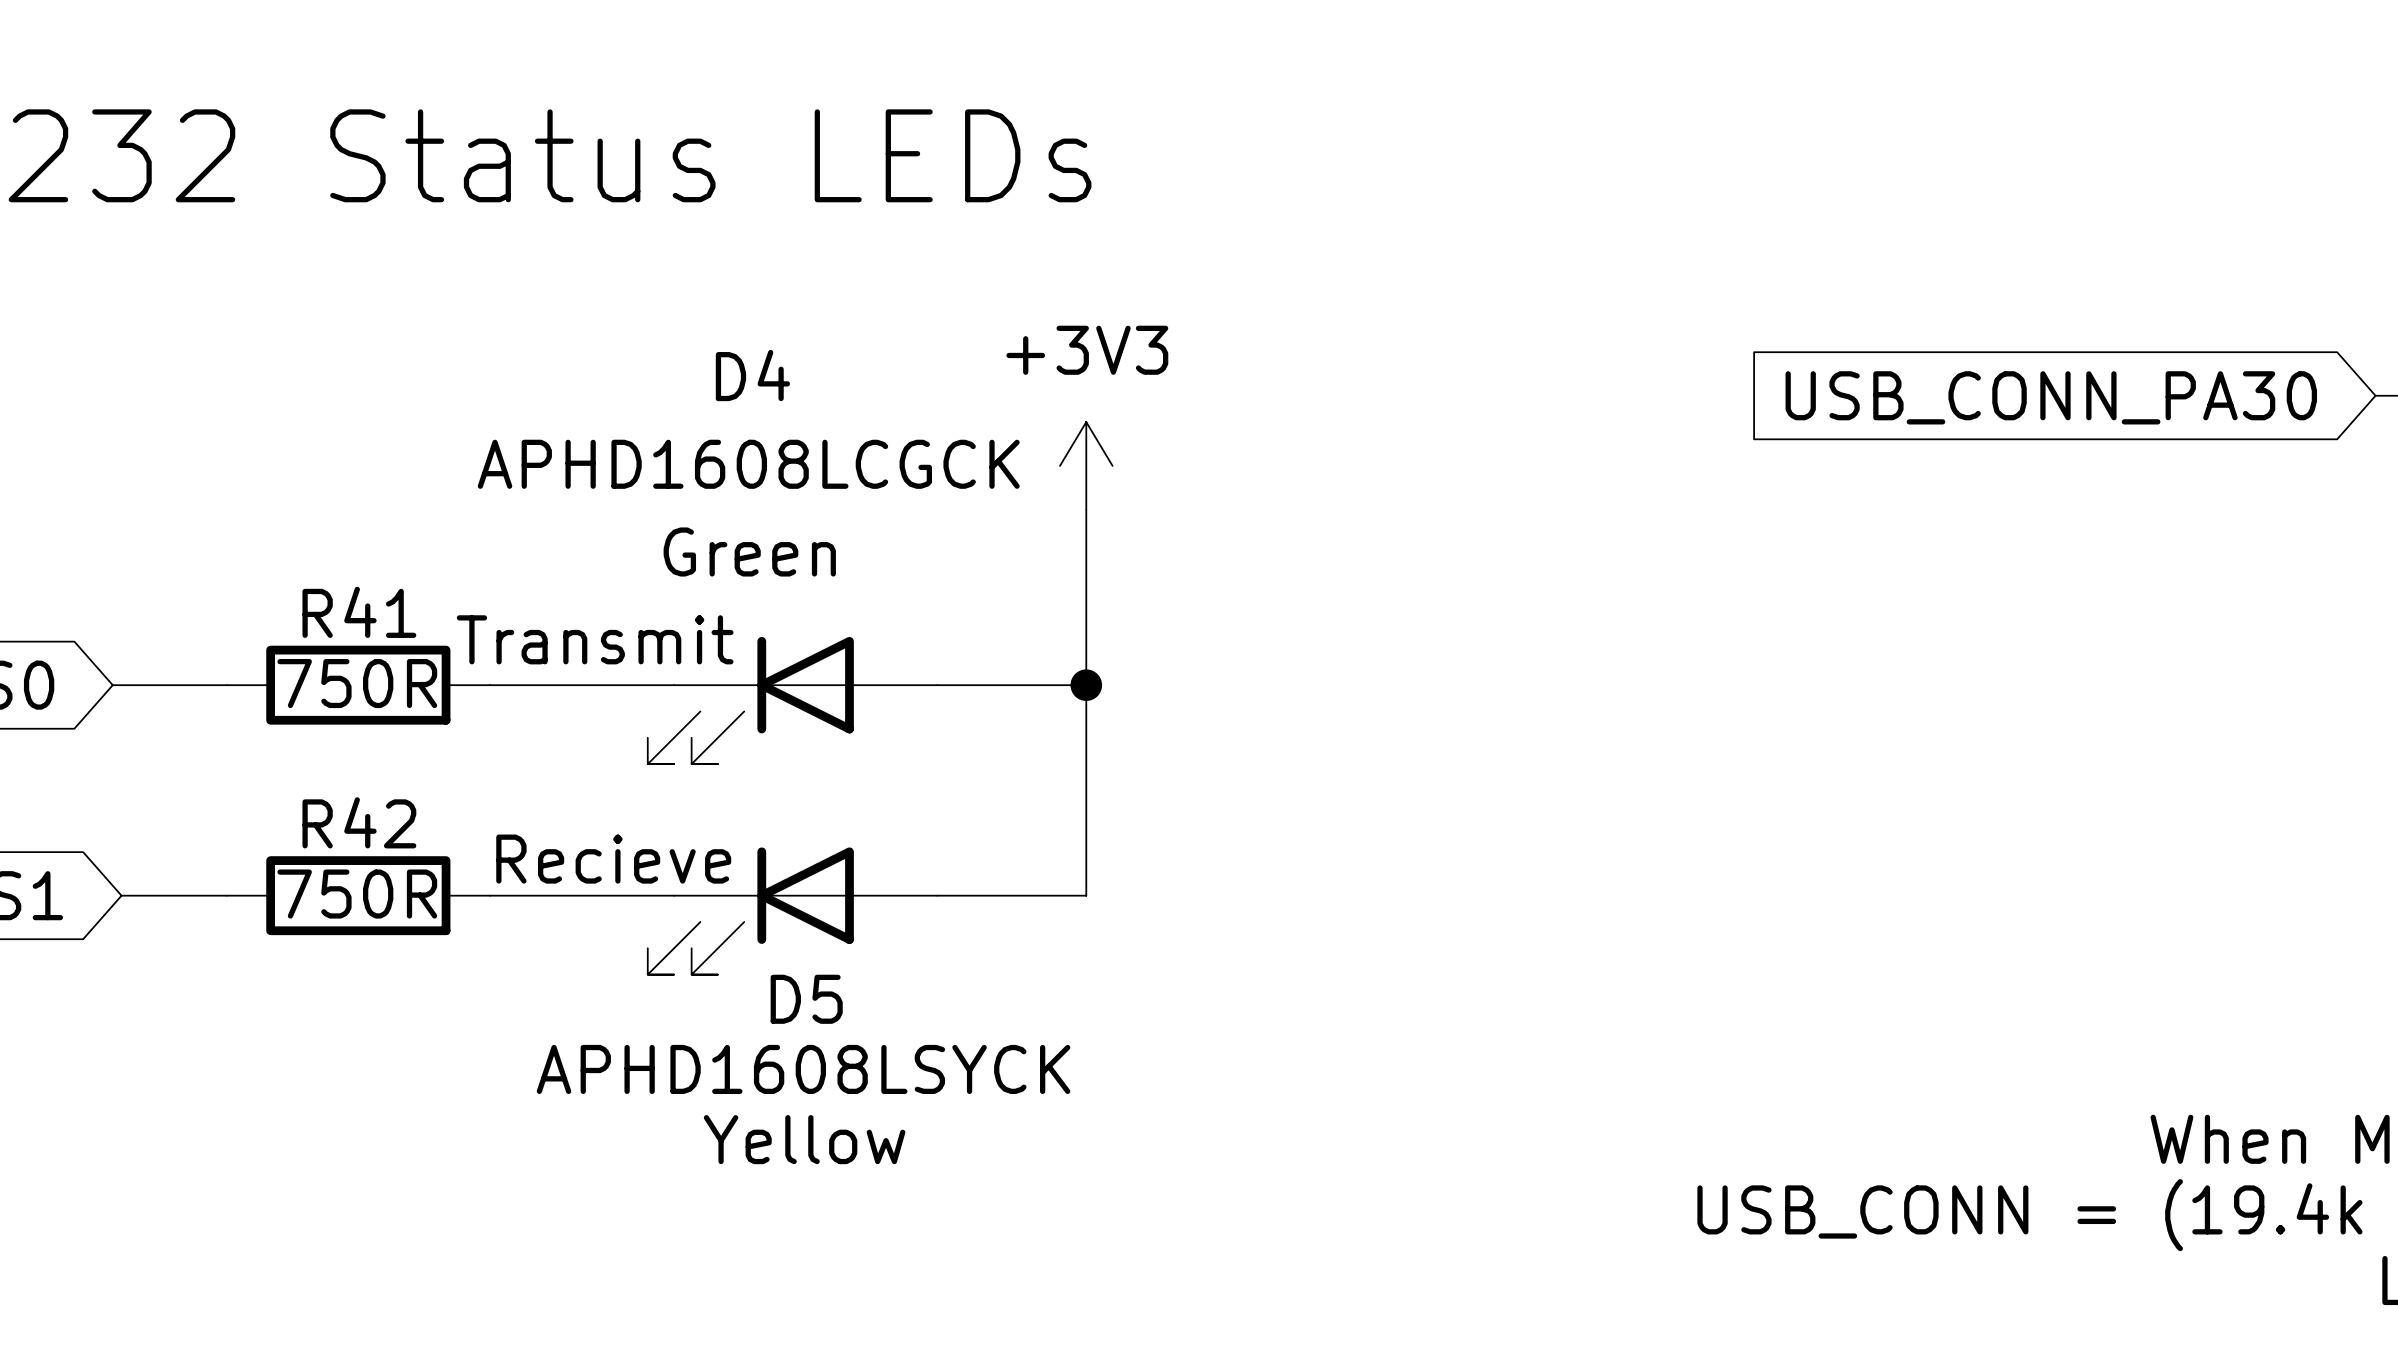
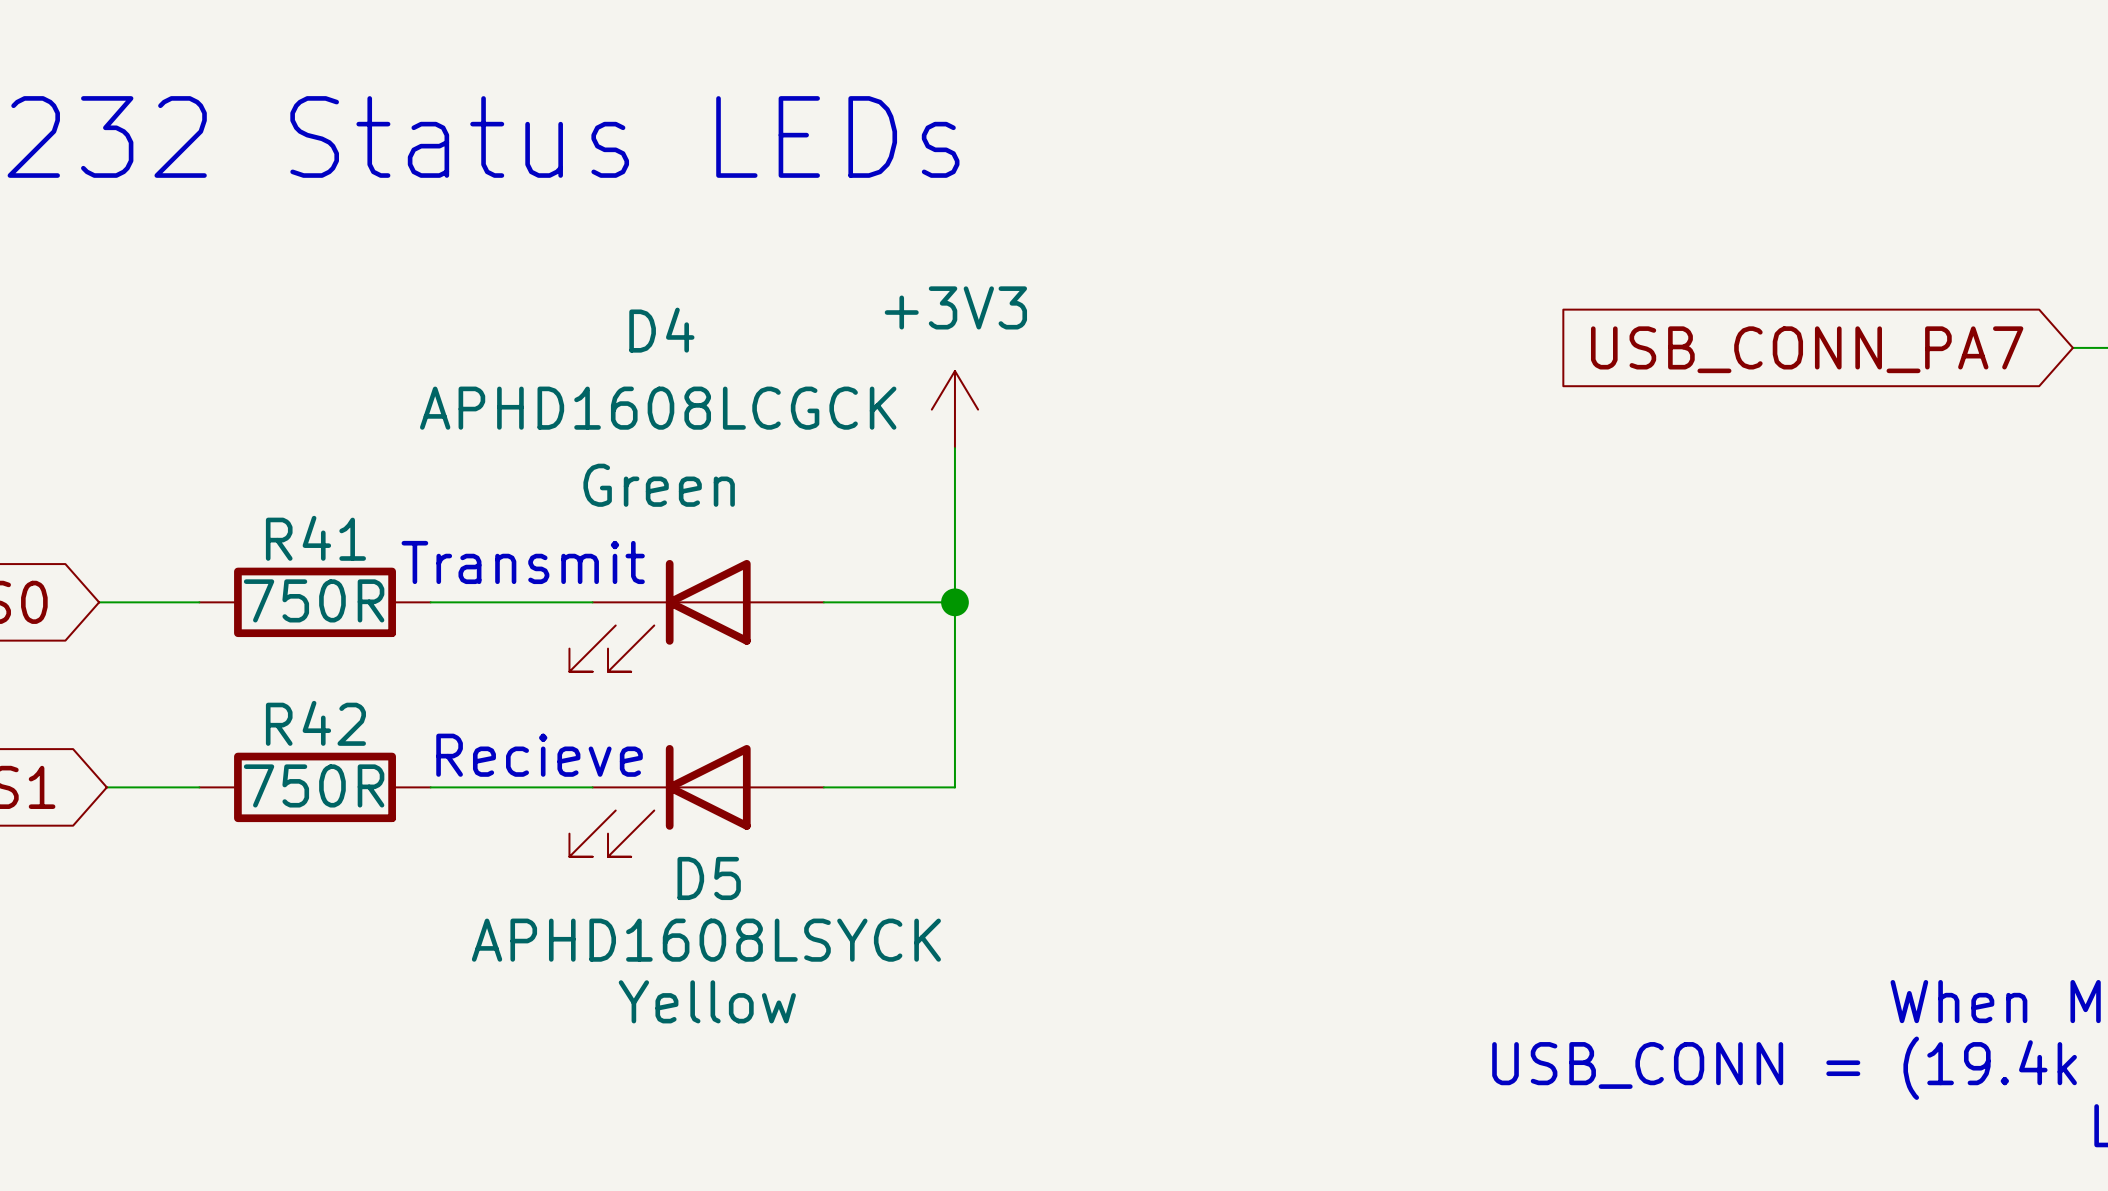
wire: none -> (2072, 347) (2088, 347)
global label: USB_CONN_PA30 (2051, 397) -> USB_CONN_PA7 (1807, 349)

